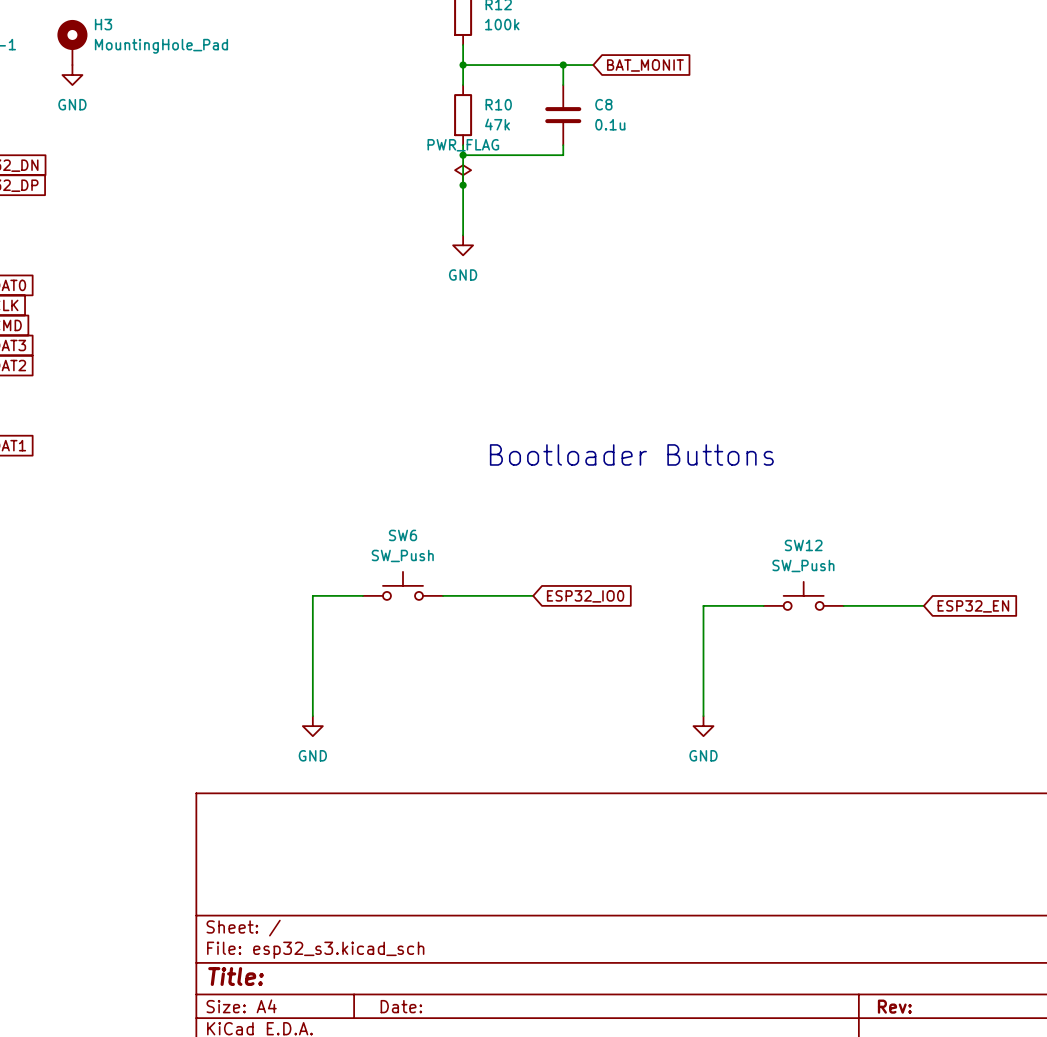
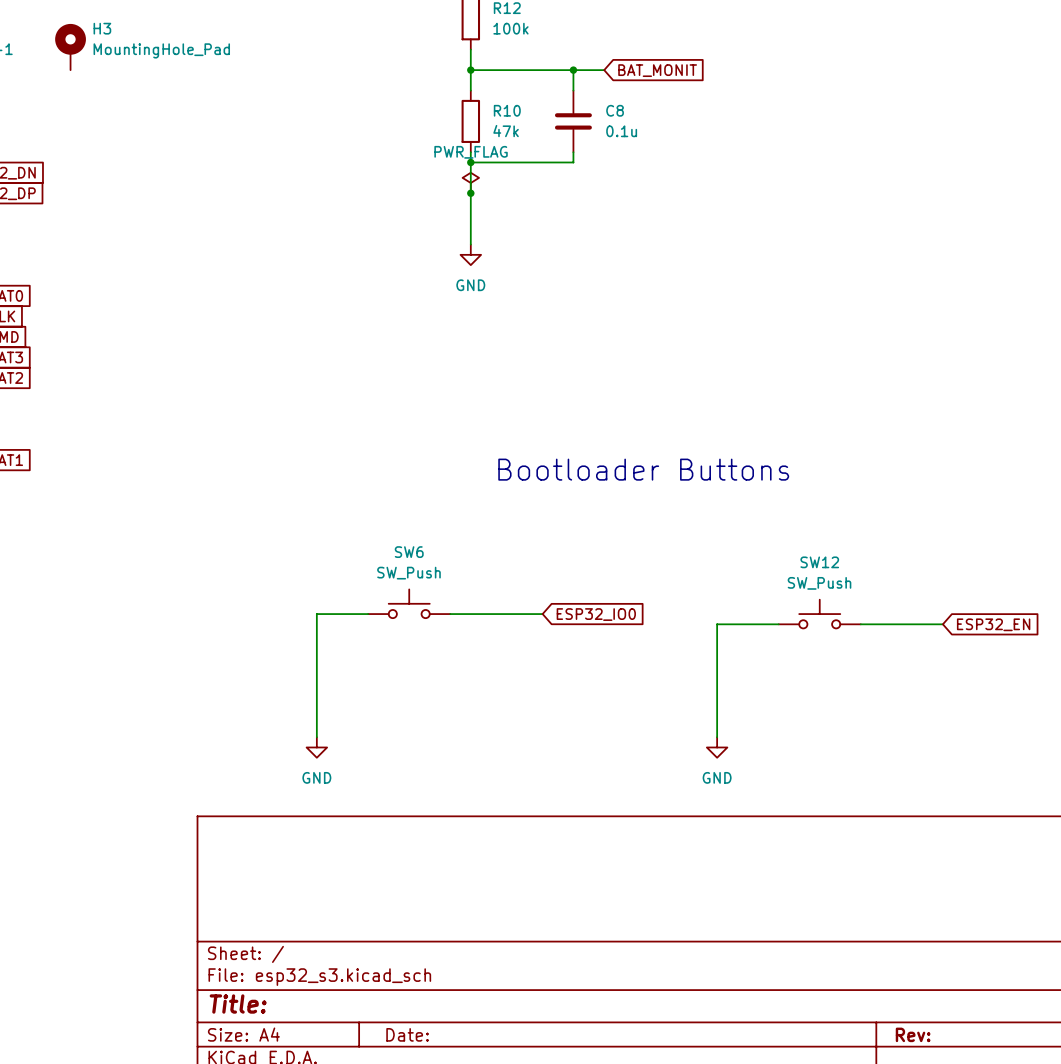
power symbol: GND (72, 75) -> none

